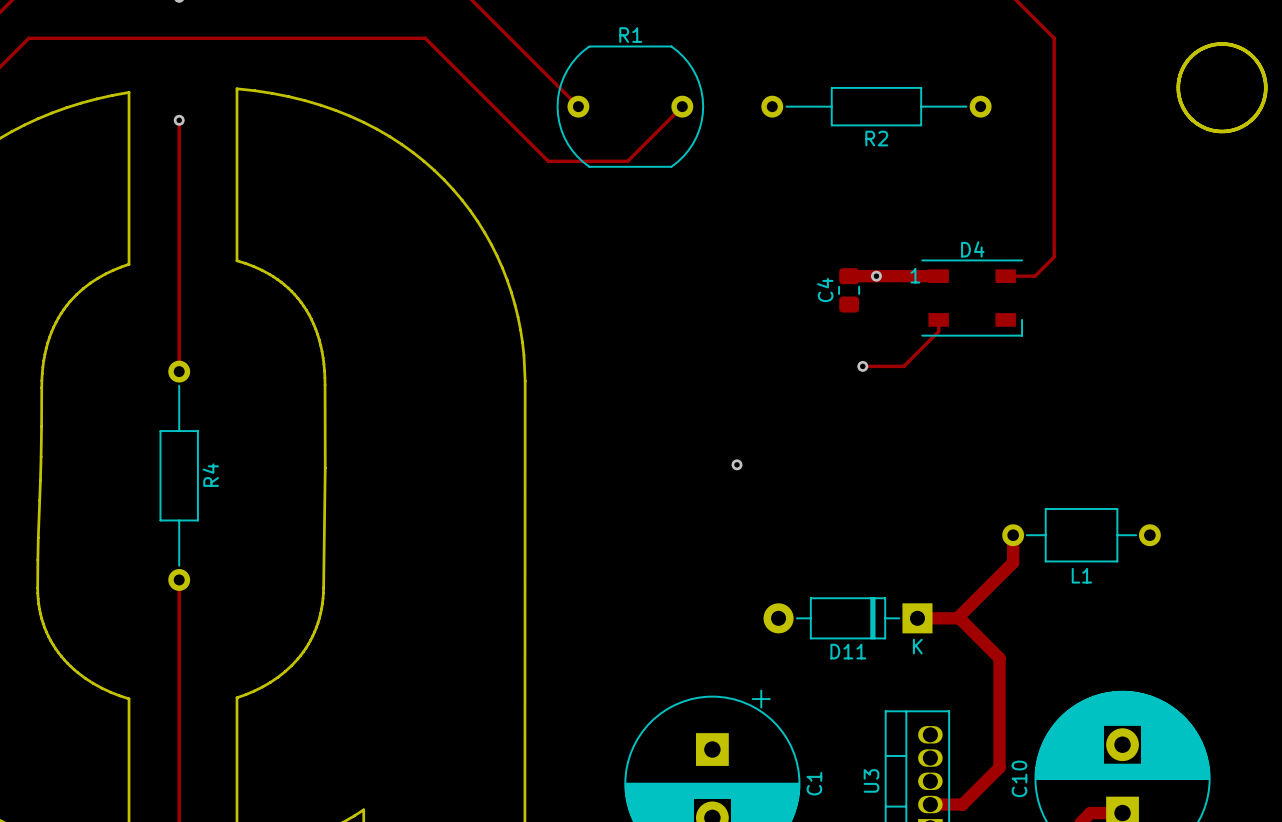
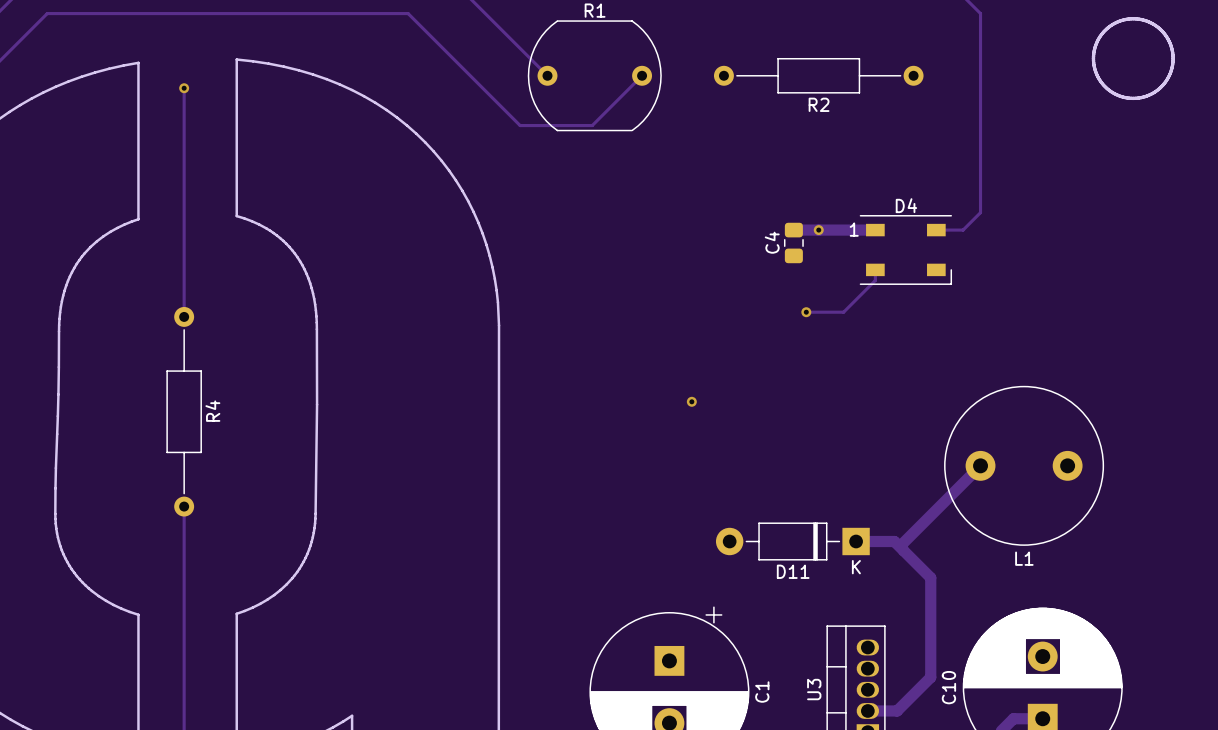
L1 footprint: [1002, 508, 1161, 563] -> [944, 385, 1105, 546]
track: (1013, 535) (1013, 562) (958, 617) -> none
track: none -> (980, 465) (903, 542) (903, 550)
L1 name position: L1 (1081, 575) -> L1 (1024, 558)

